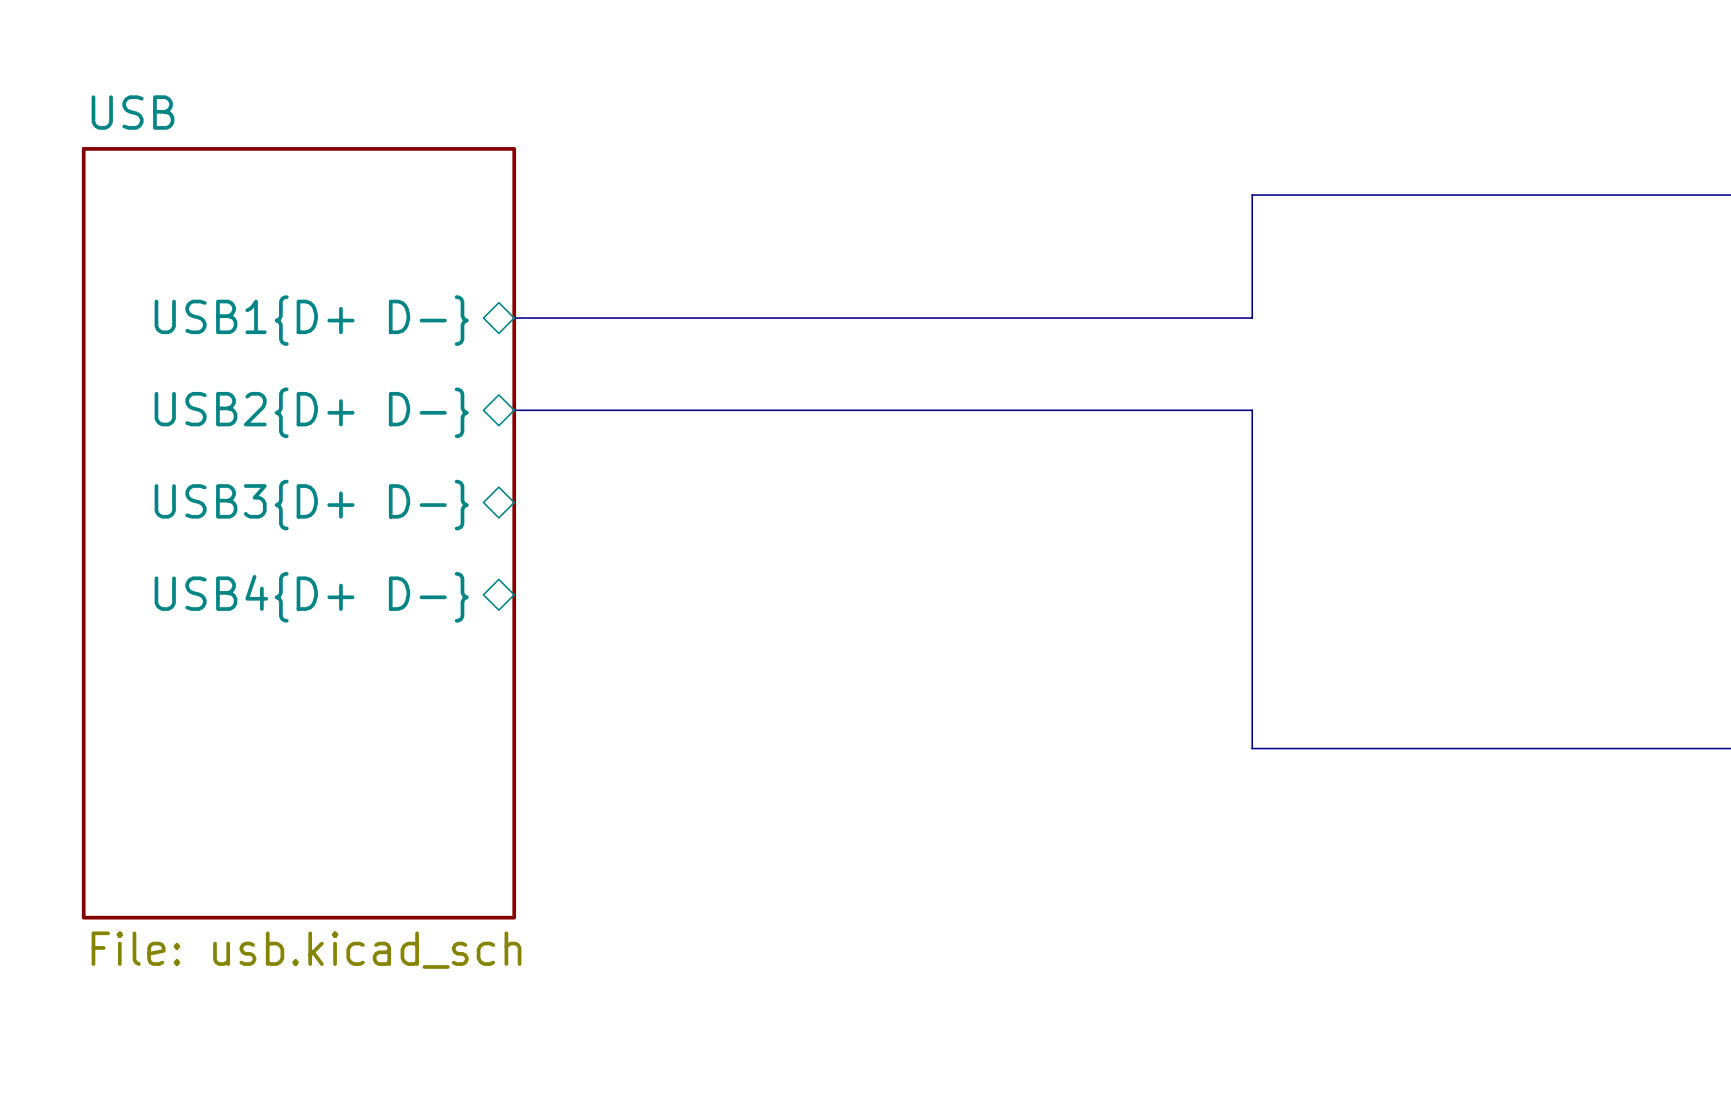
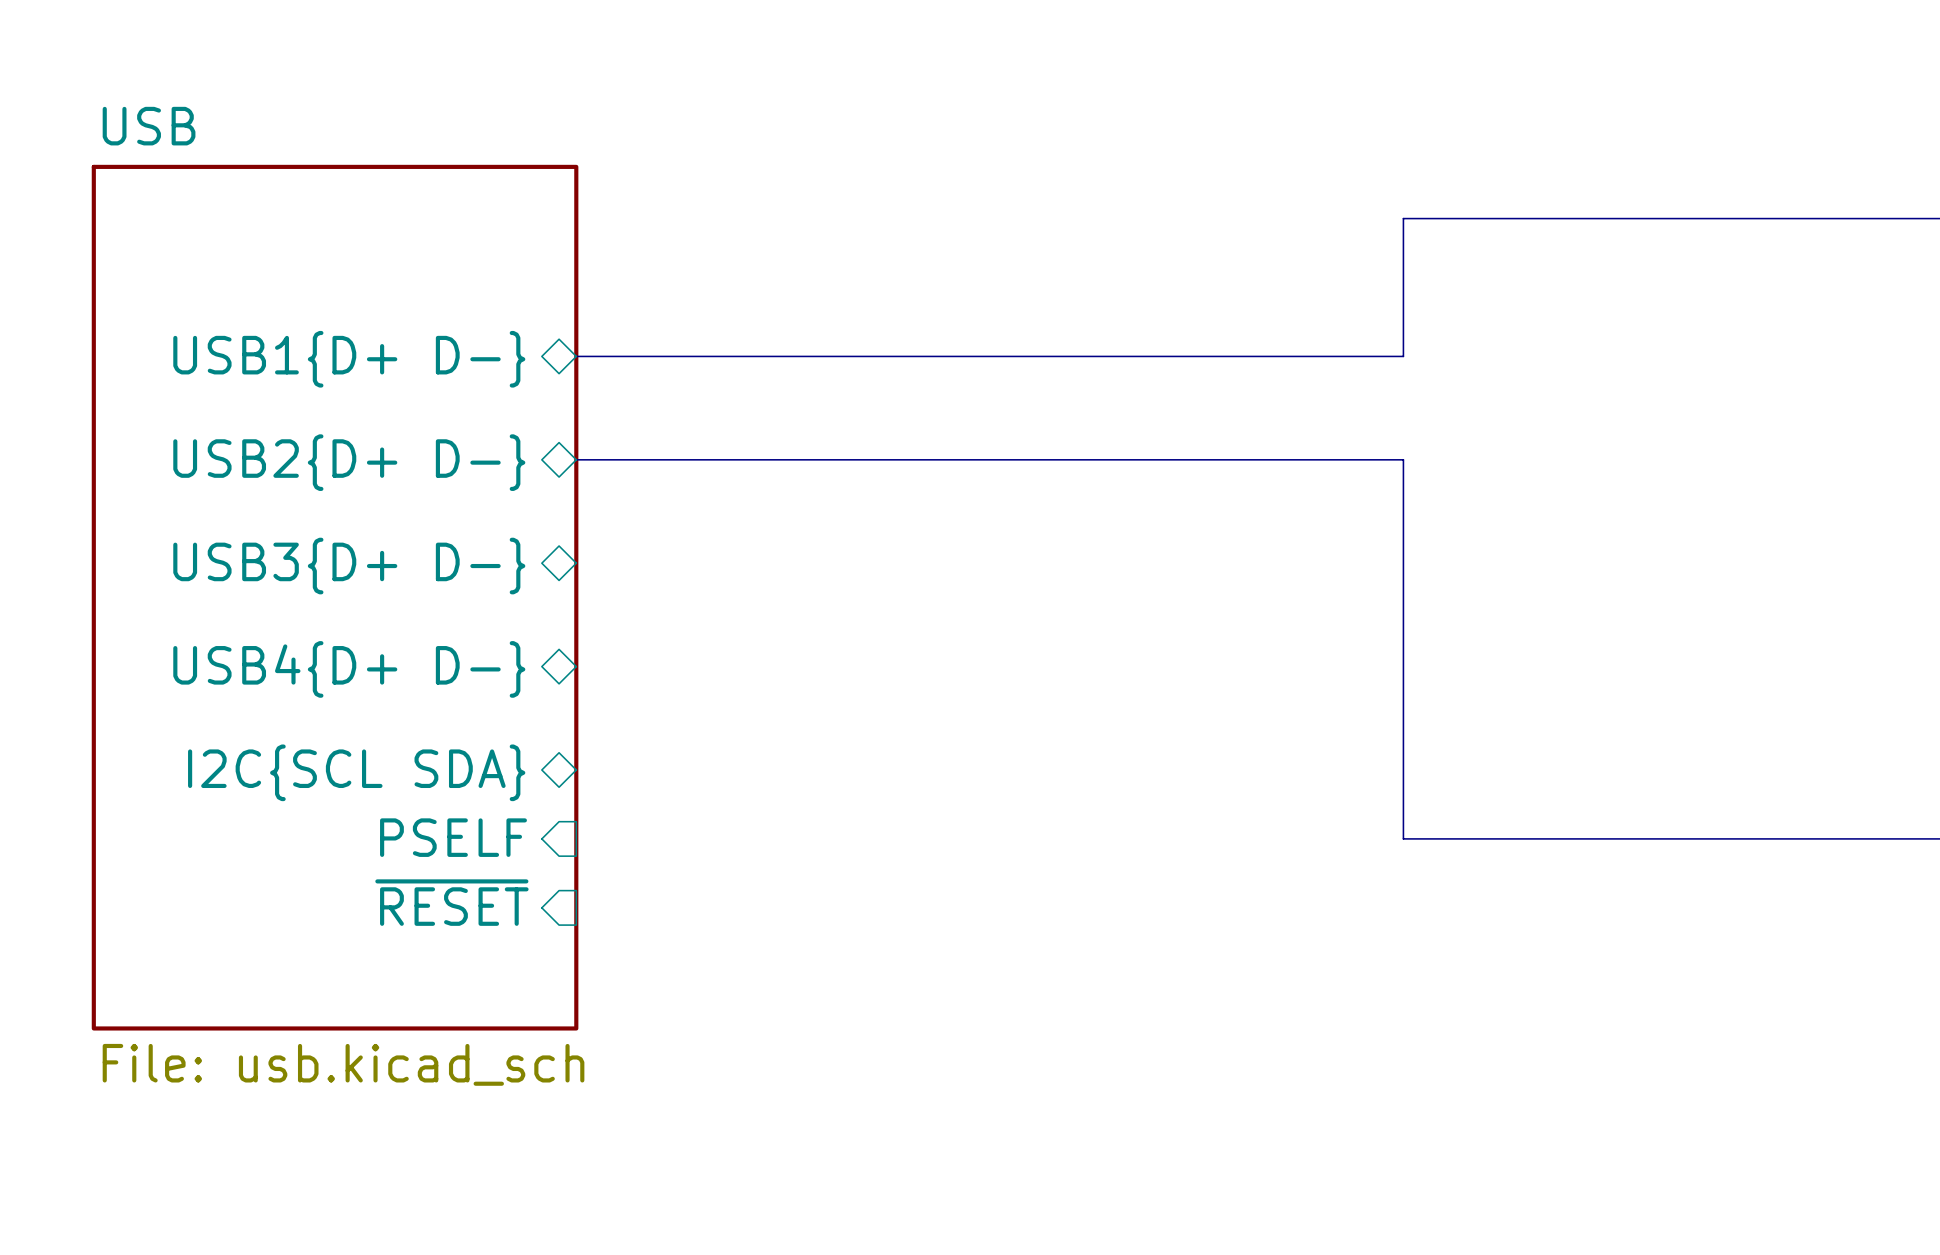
sheet pin: none -> I2C{SCL SDA} (356, 772)
sheet pin: none -> PSELF (453, 837)
sheet pin: none -> ~{RESET} (451, 902)

